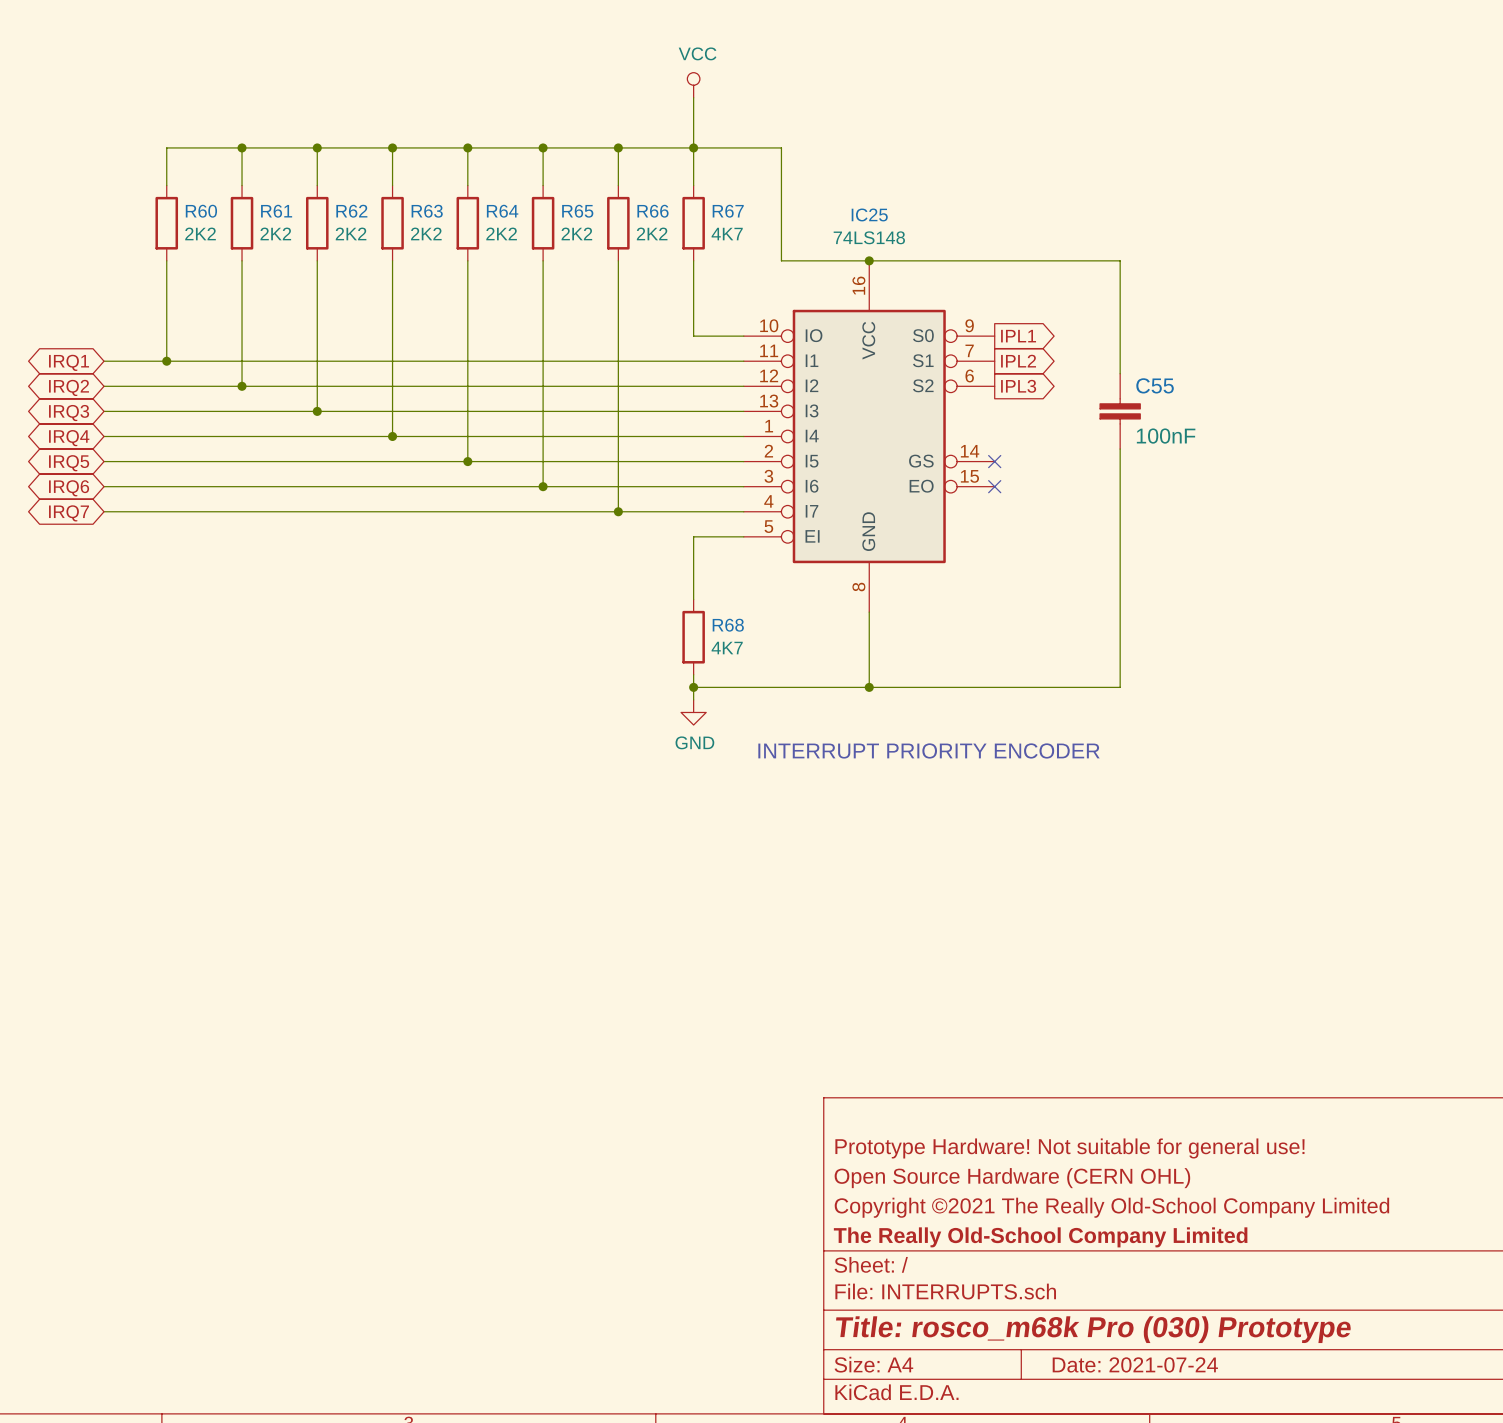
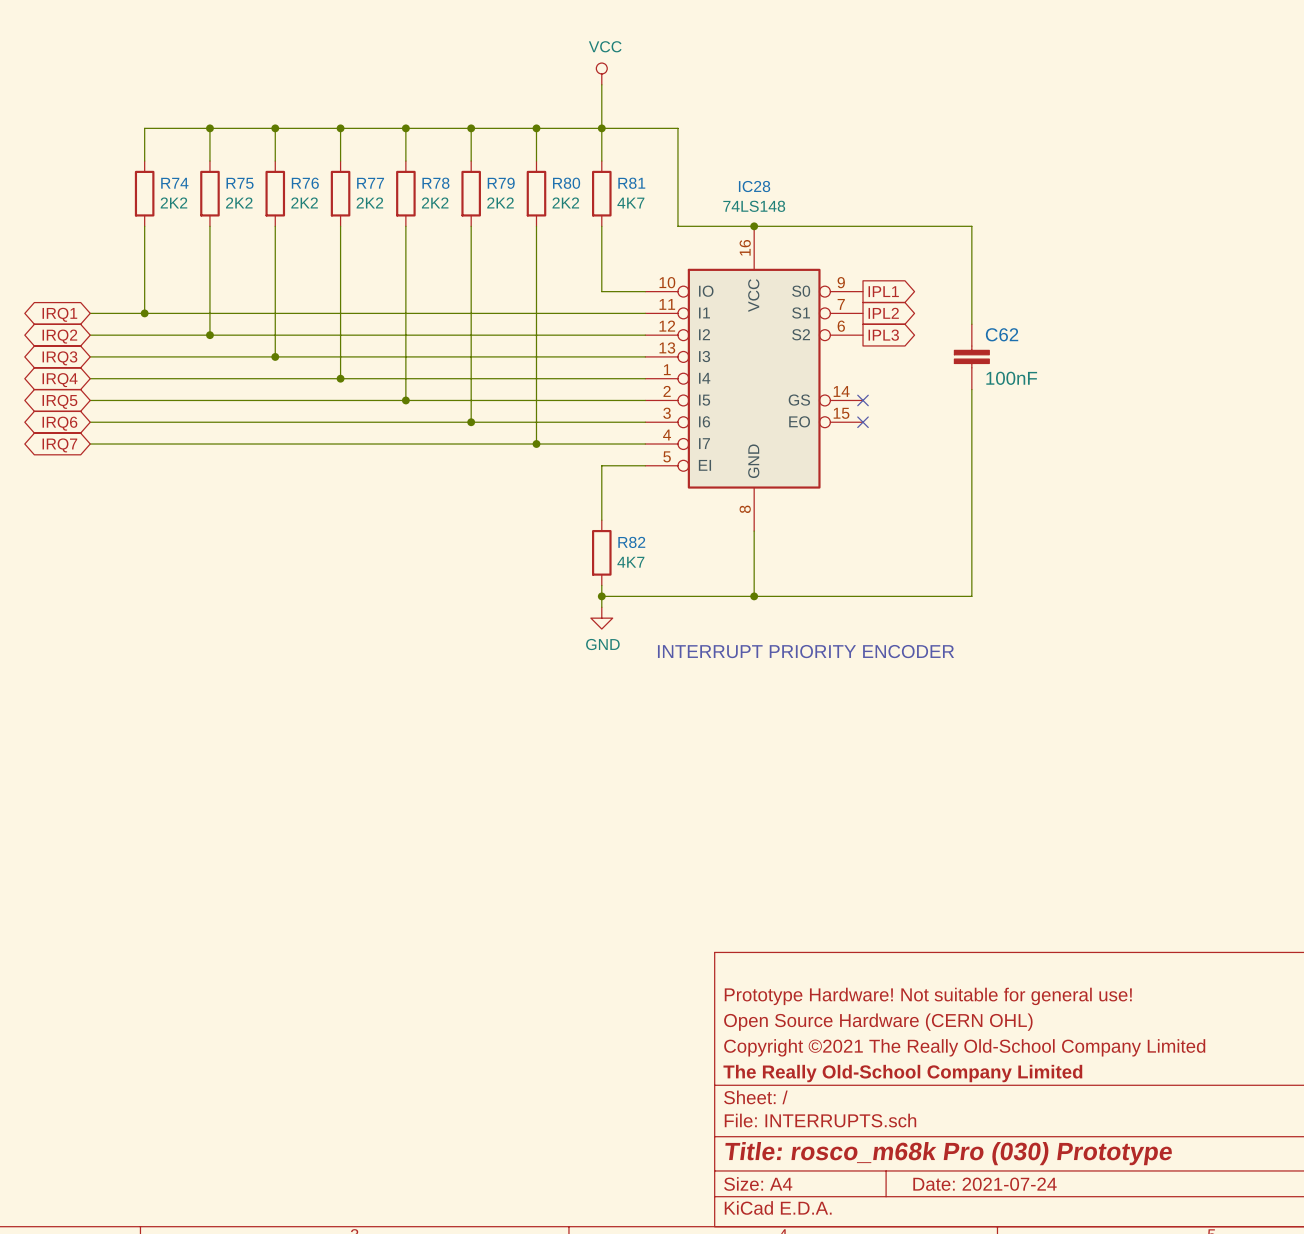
R60 name: R60 (201, 211) -> R74 (174, 183)
R61 name: R61 (276, 211) -> R75 (240, 183)
R62 name: R62 (351, 211) -> R76 (305, 183)
R63 name: R63 (427, 211) -> R77 (370, 183)
R64 name: R64 (502, 211) -> R78 (435, 183)
R65 name: R65 (577, 211) -> R79 (501, 183)
R66 name: R66 (652, 211) -> R80 (566, 183)
R67 name: R67 (728, 211) -> R81 (631, 183)
IC25 name: IC25 (869, 214) -> IC28 (754, 186)
C55 name: C55 (1155, 385) -> C62 (1002, 334)
R68 name: R68 (728, 625) -> R82 (631, 542)

